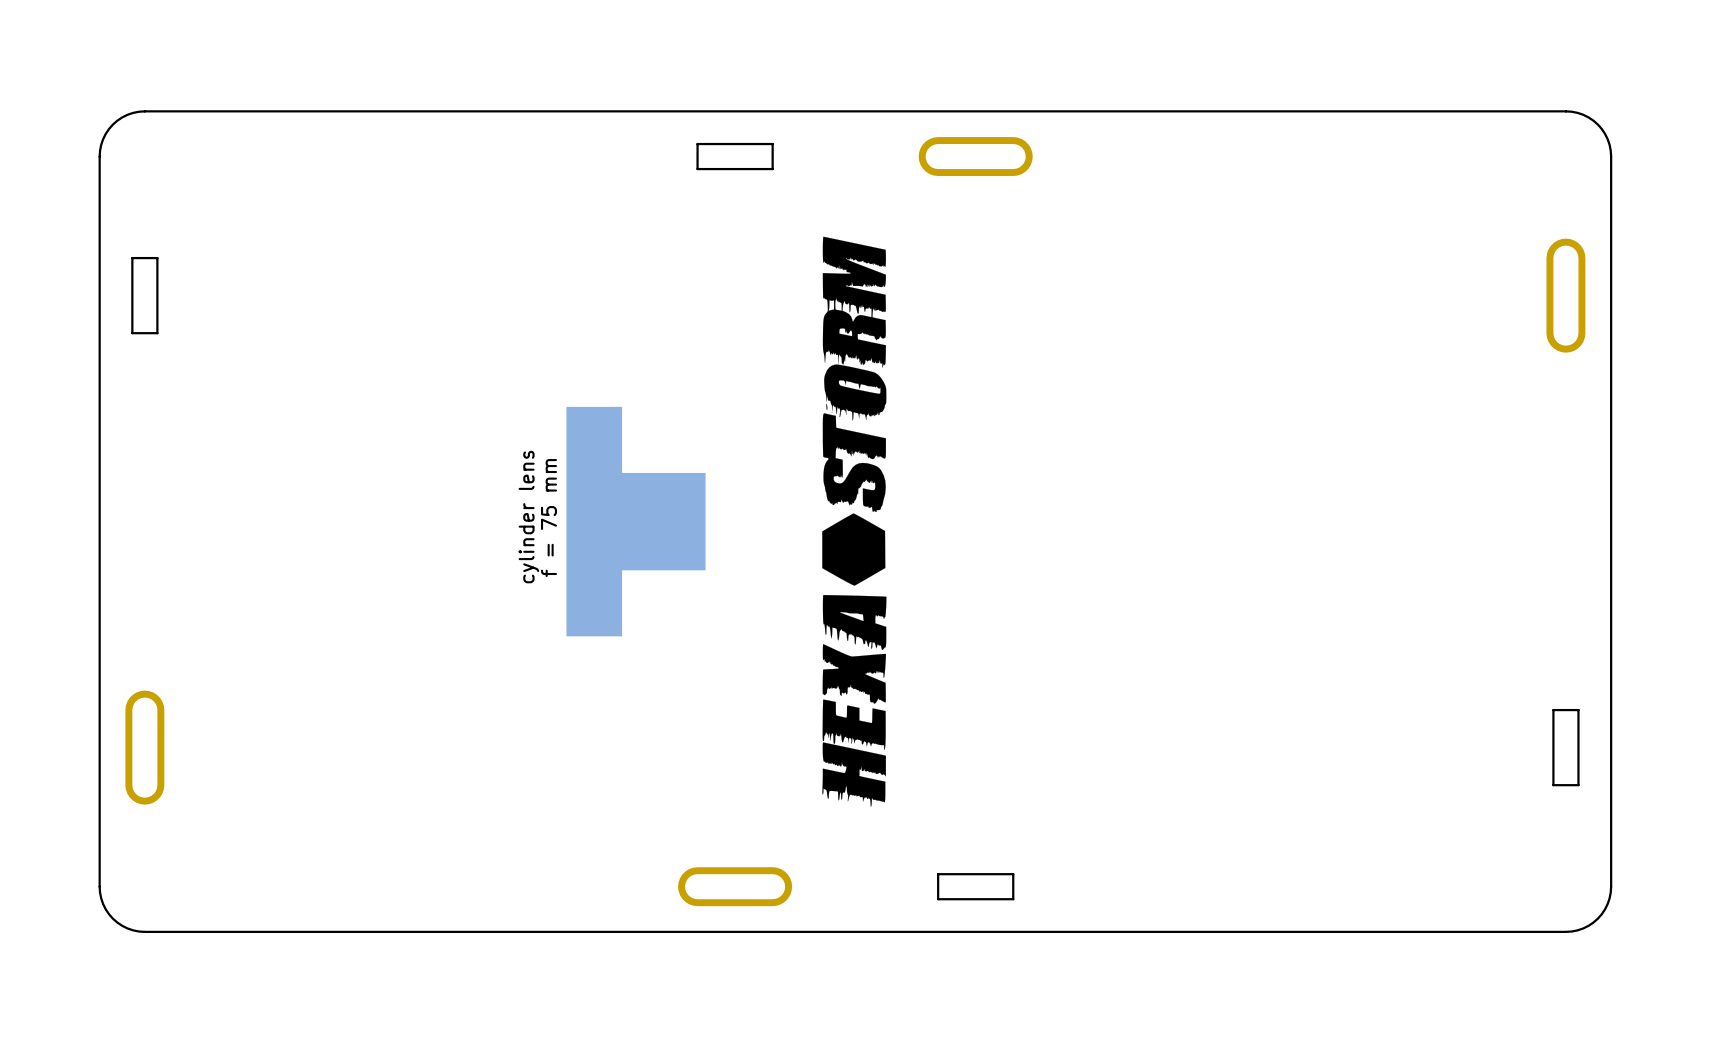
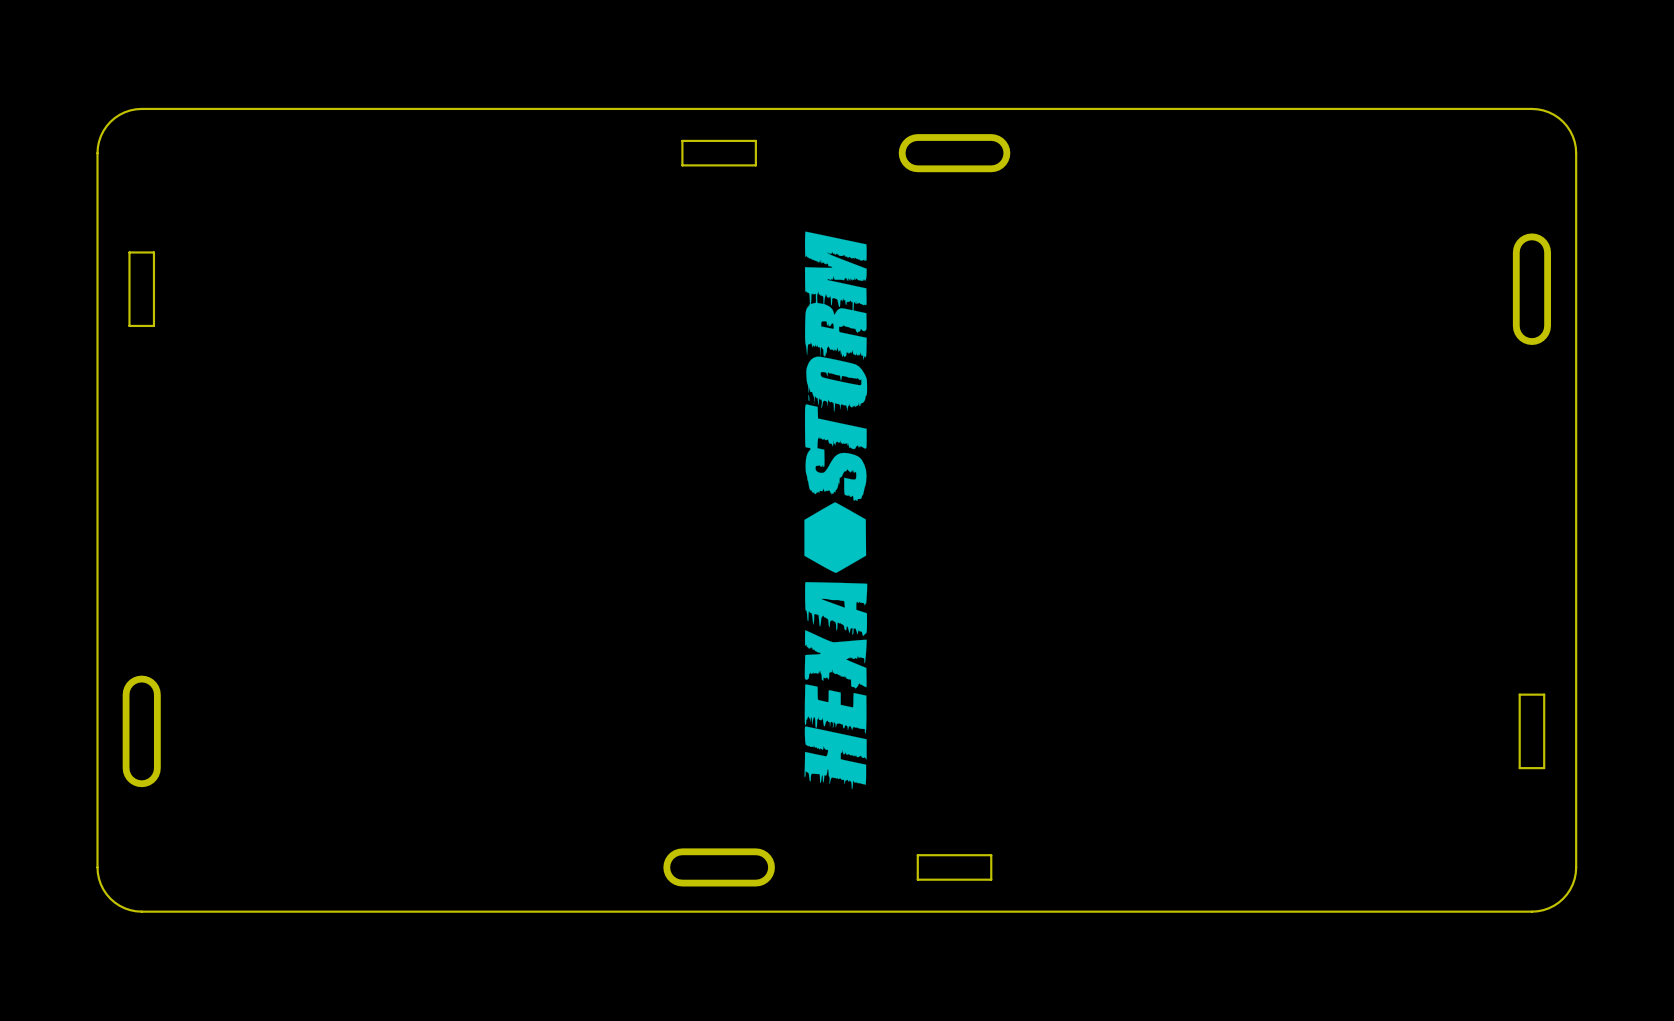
text: cylinder lens (528, 517) -> none
text: f = 75 mm (548, 518) -> none
part: (636, 521) -> none

